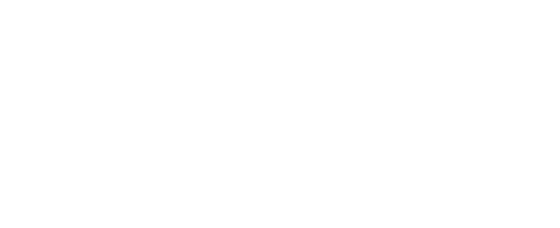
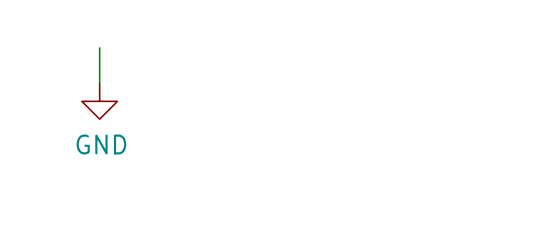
wire: none -> (99, 47) (99, 83)
power symbol: none -> GND (99, 101)

